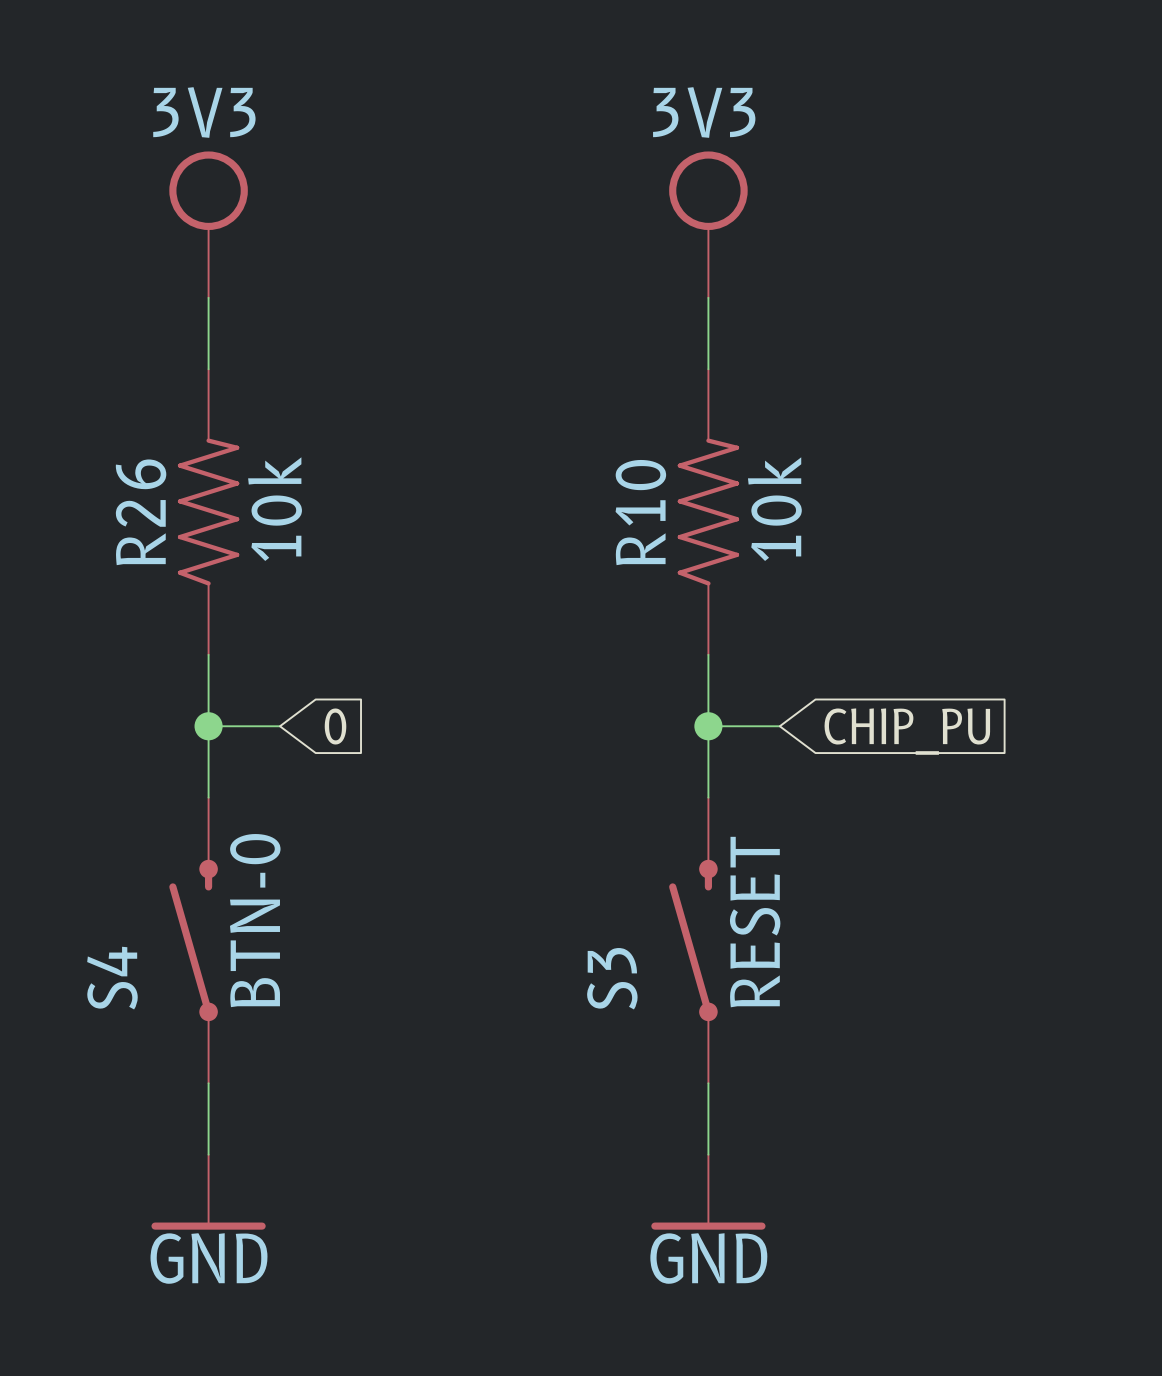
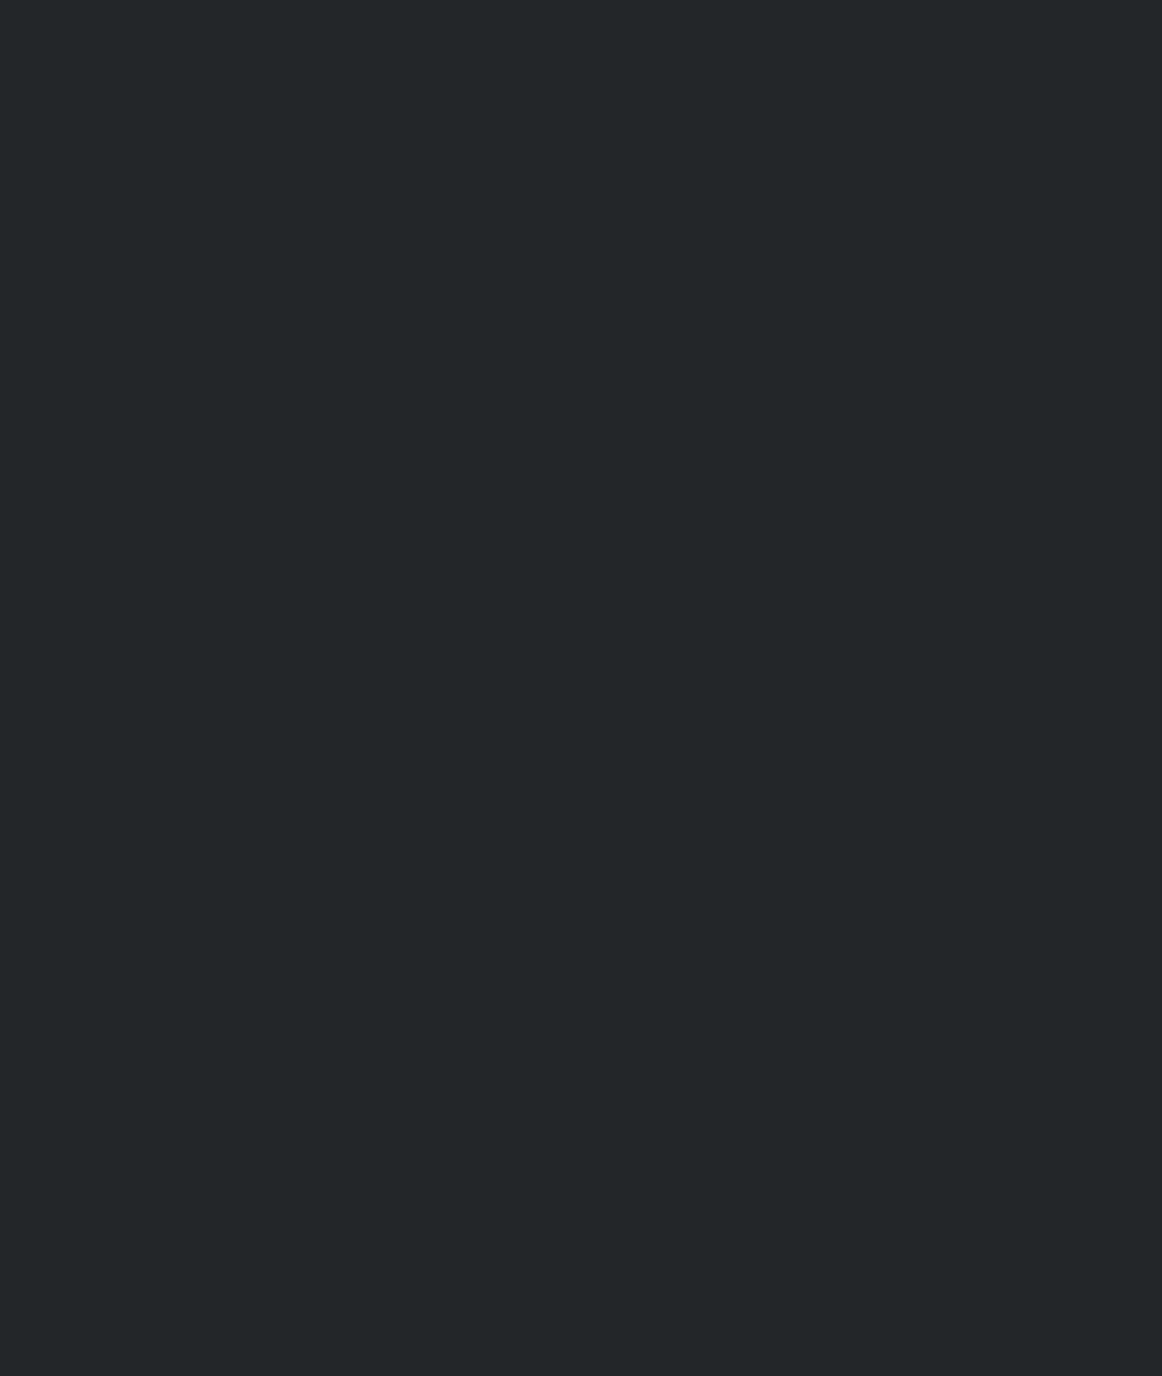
power symbol: 3V3 (208, 224) -> none
power symbol: 3V3 (708, 224) -> none
wire: (208, 297) (208, 369) -> none
wire: (708, 297) (708, 369) -> none
R26: 10k (208, 512) -> none
R10: 10k (708, 512) -> none
wire: (208, 654) (208, 797) -> none
wire: (708, 654) (708, 797) -> none
wire: (208, 726) (279, 726) -> none
junction: (208, 726) -> none
global label: 0 (335, 726) -> none
wire: (708, 726) (779, 726) -> none
junction: (708, 726) -> none
global label: CHIP_PU (907, 731) -> none
S4: BTN-0 (193, 940) -> none
S3: RESET (693, 940) -> none
wire: (208, 1083) (208, 1154) -> none
wire: (708, 1083) (708, 1154) -> none
power symbol: GND (208, 1192) -> none
power symbol: GND (708, 1192) -> none

